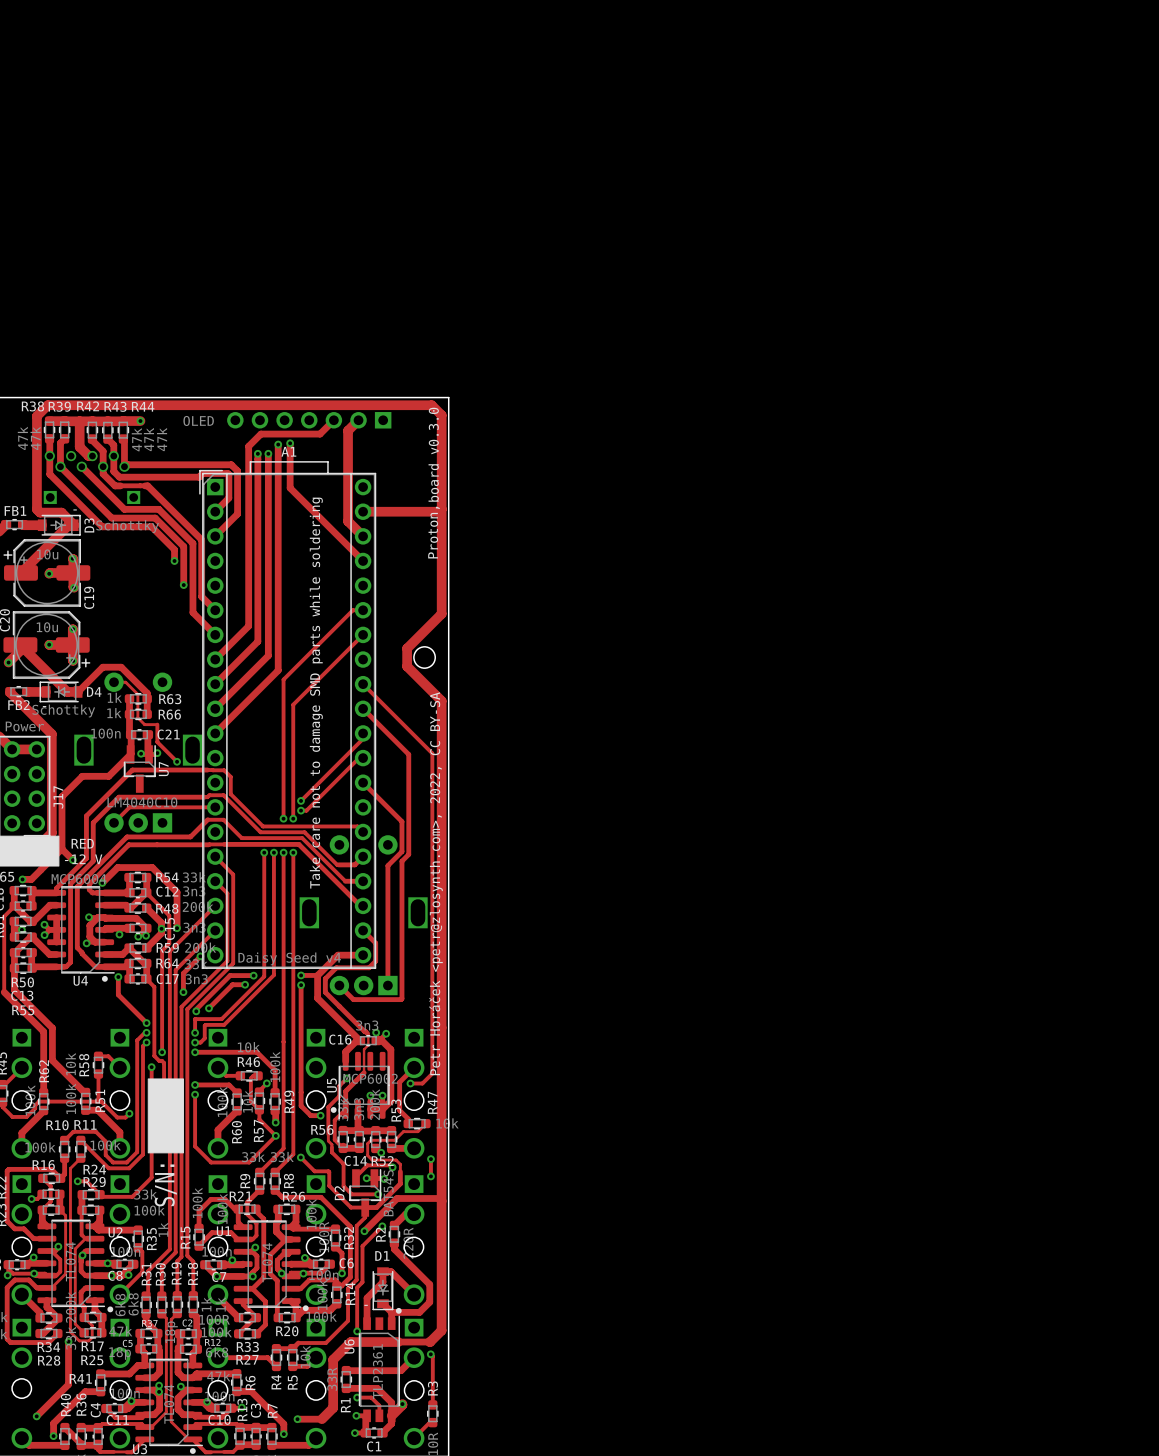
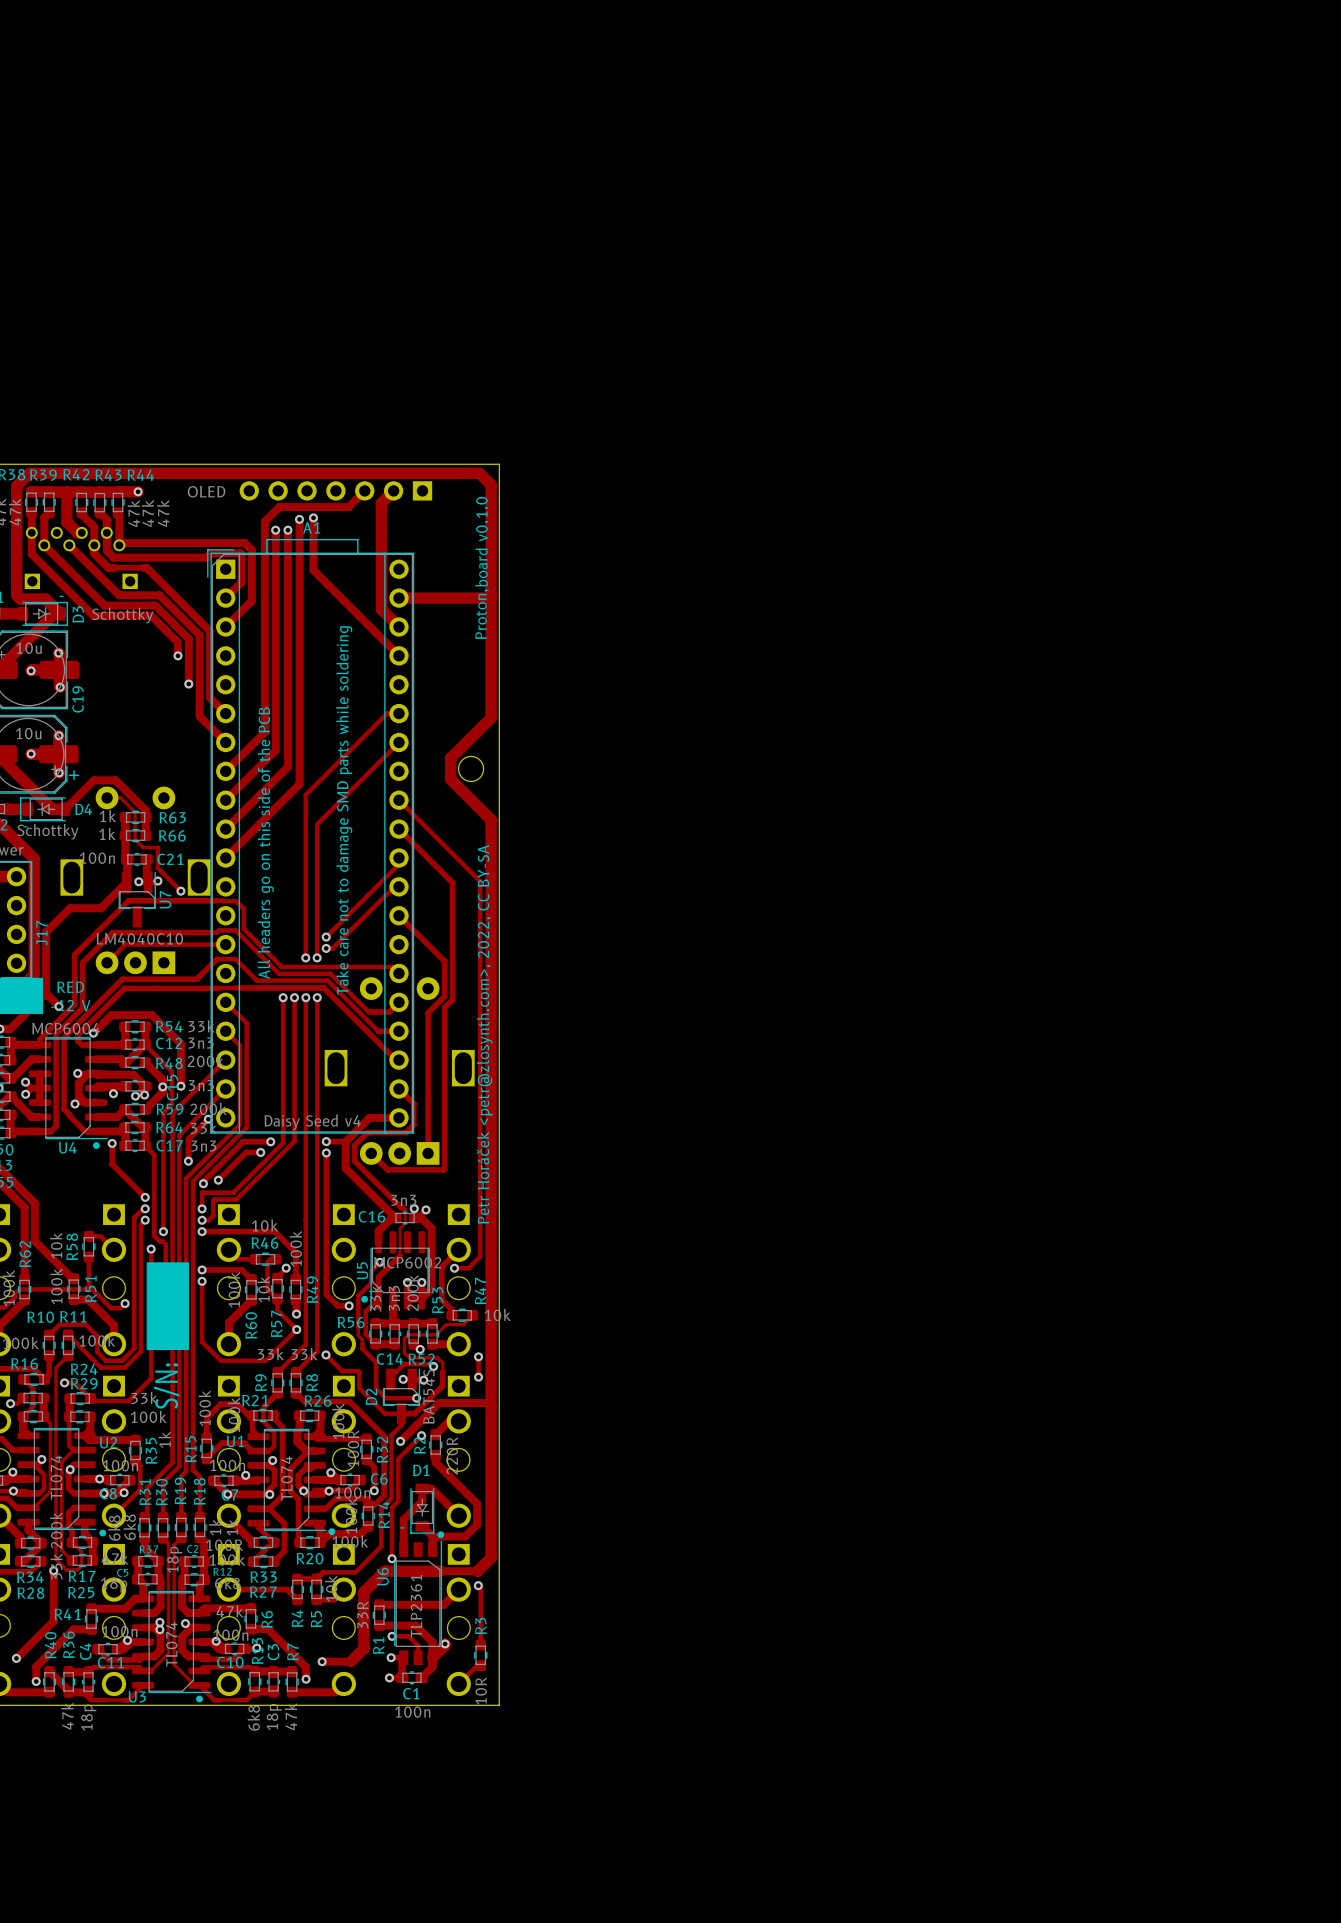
text: board v0.3.0 (433, 454) -> board v0.1.0 (481, 541)
text: none -> All headers go on this side of the PCB (265, 843)

